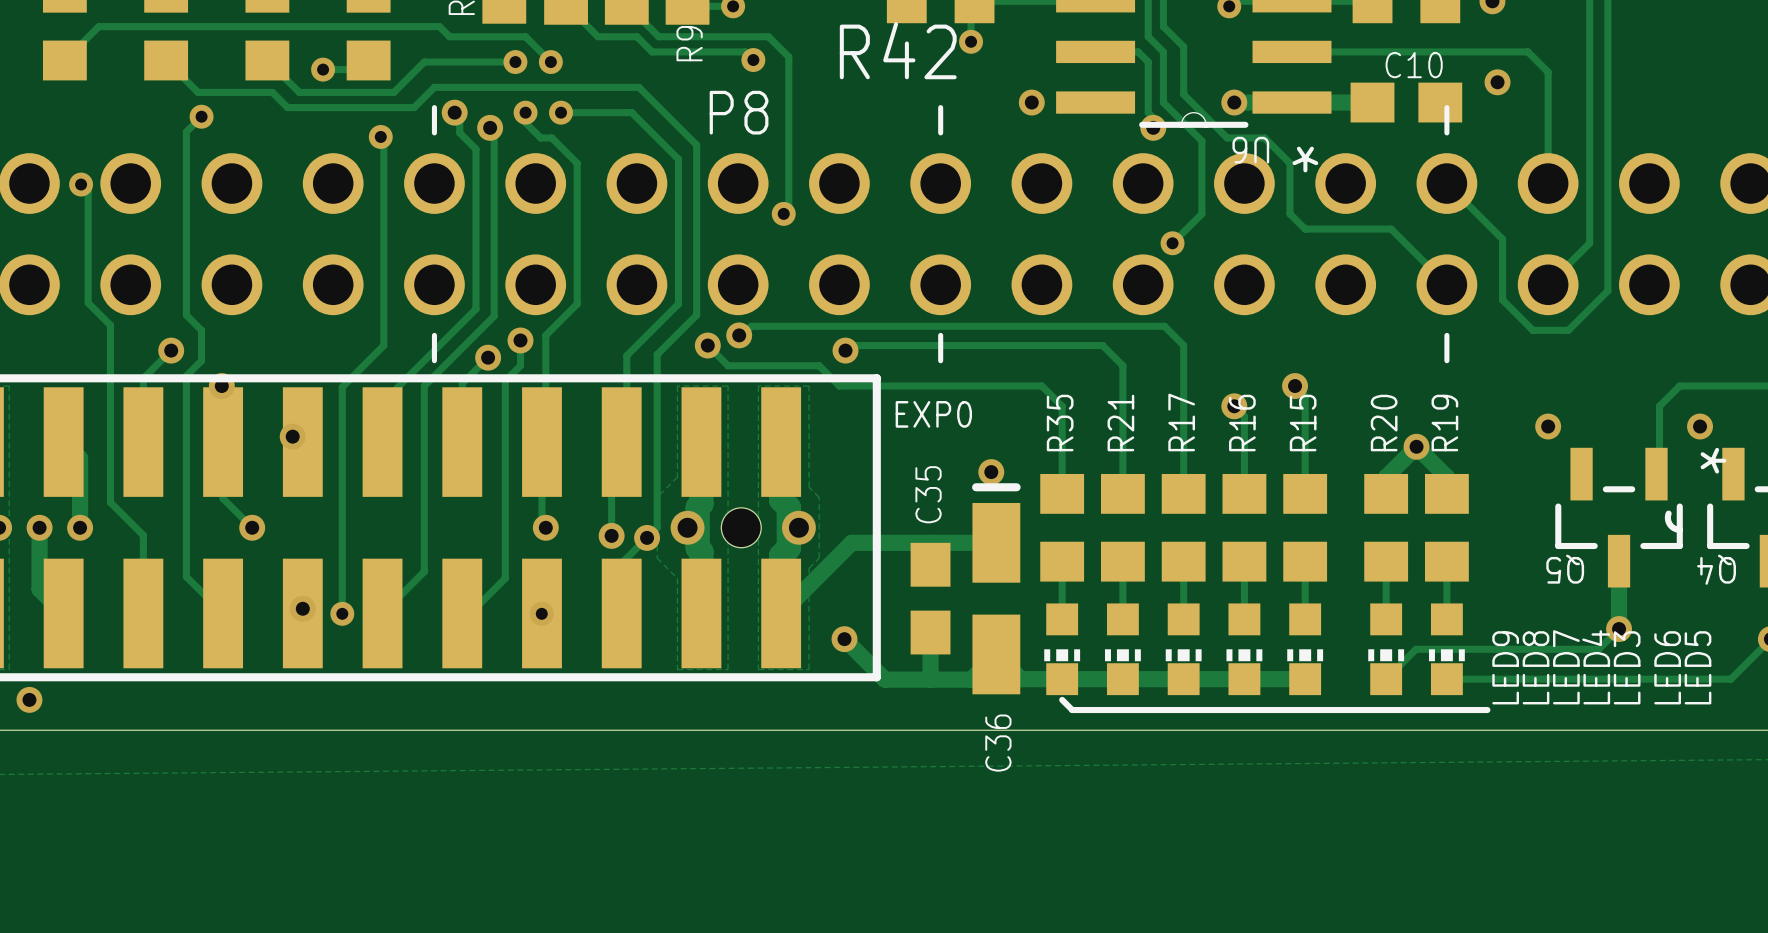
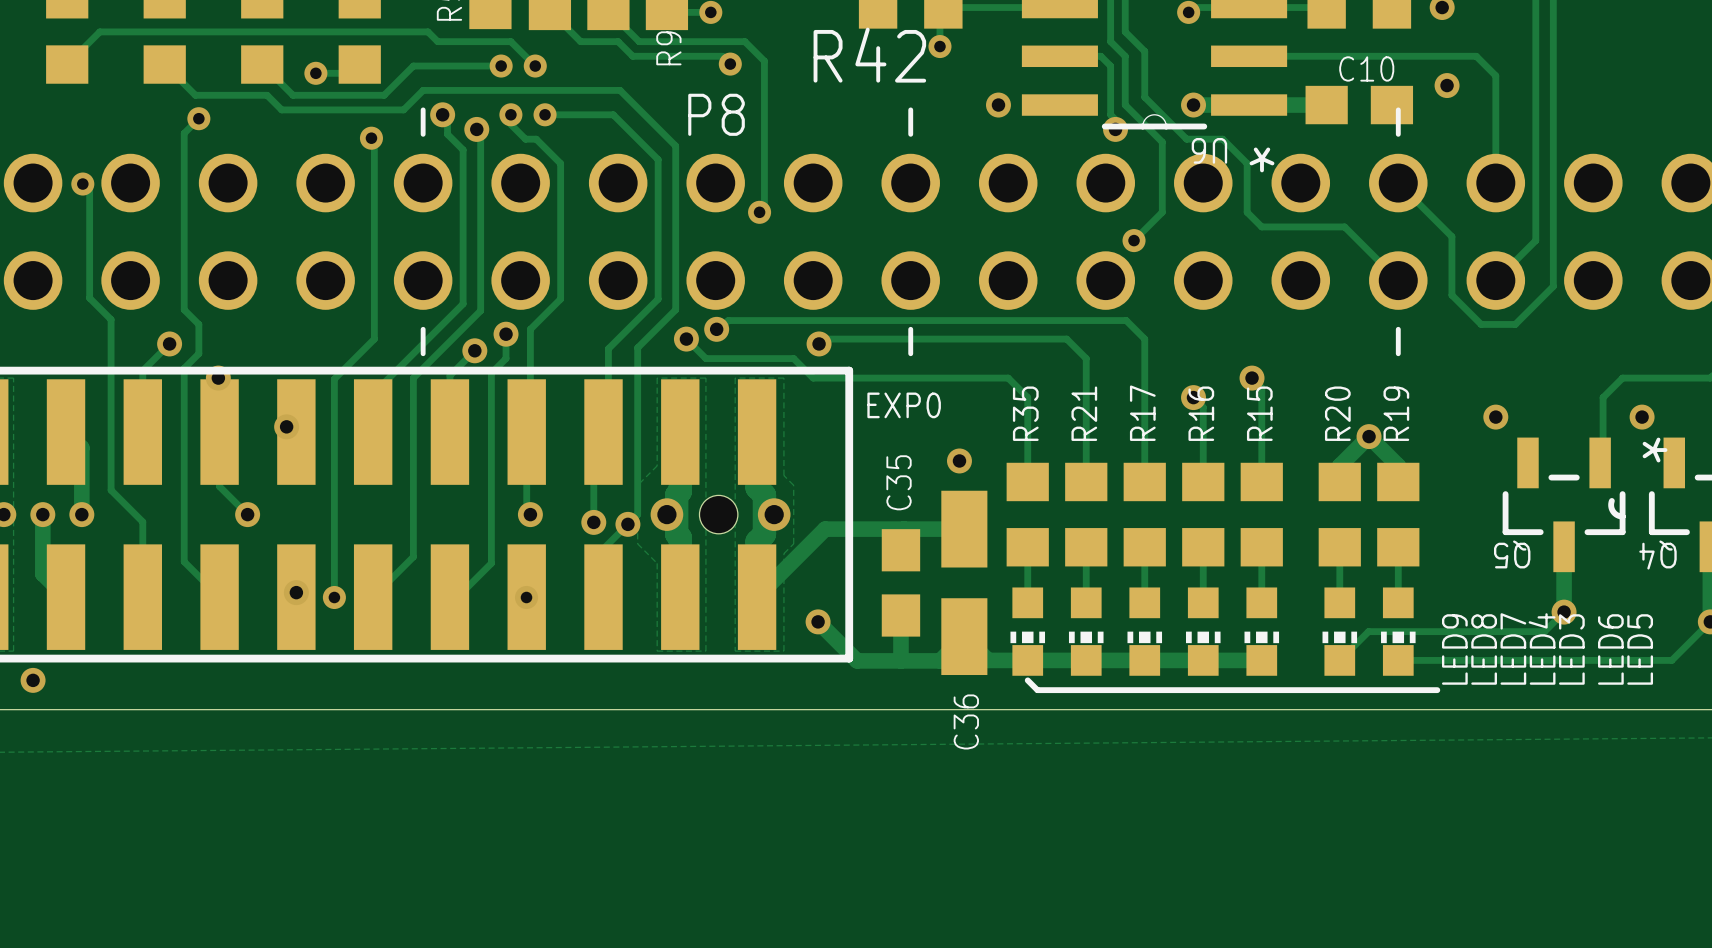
C36 footprint: [972, 483, 1021, 695] -> [941, 490, 988, 676]

